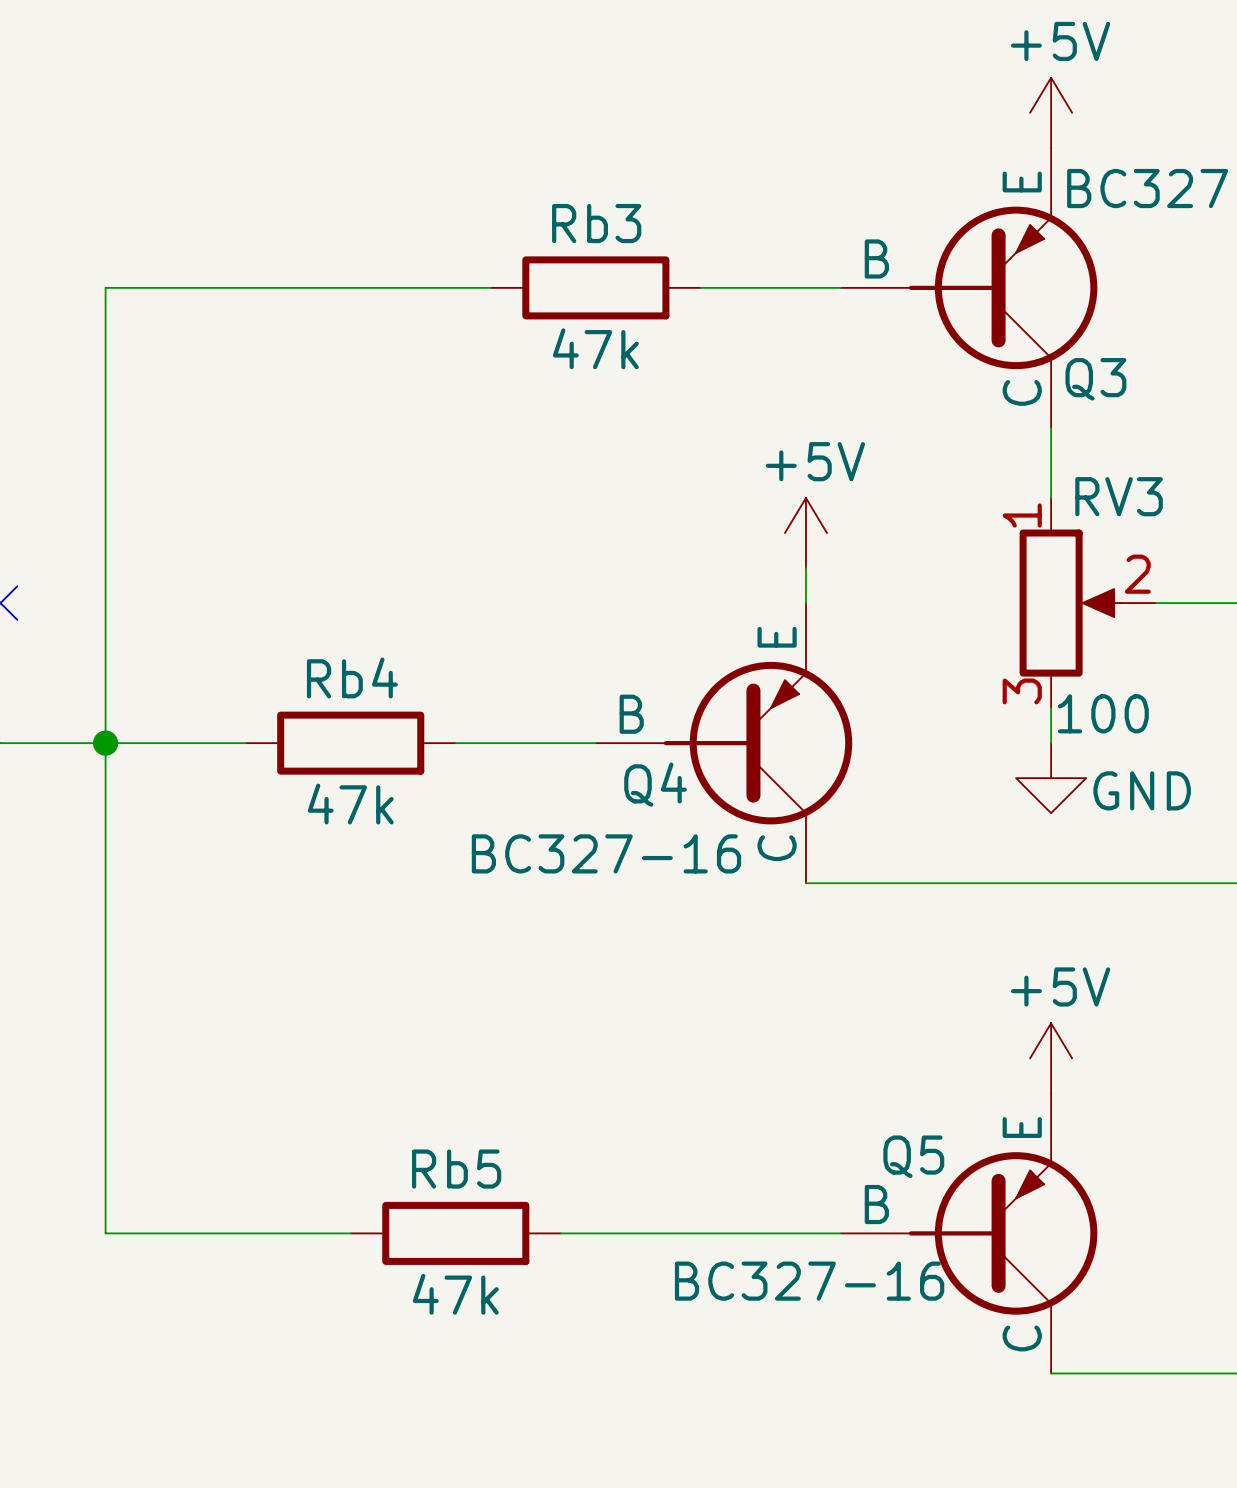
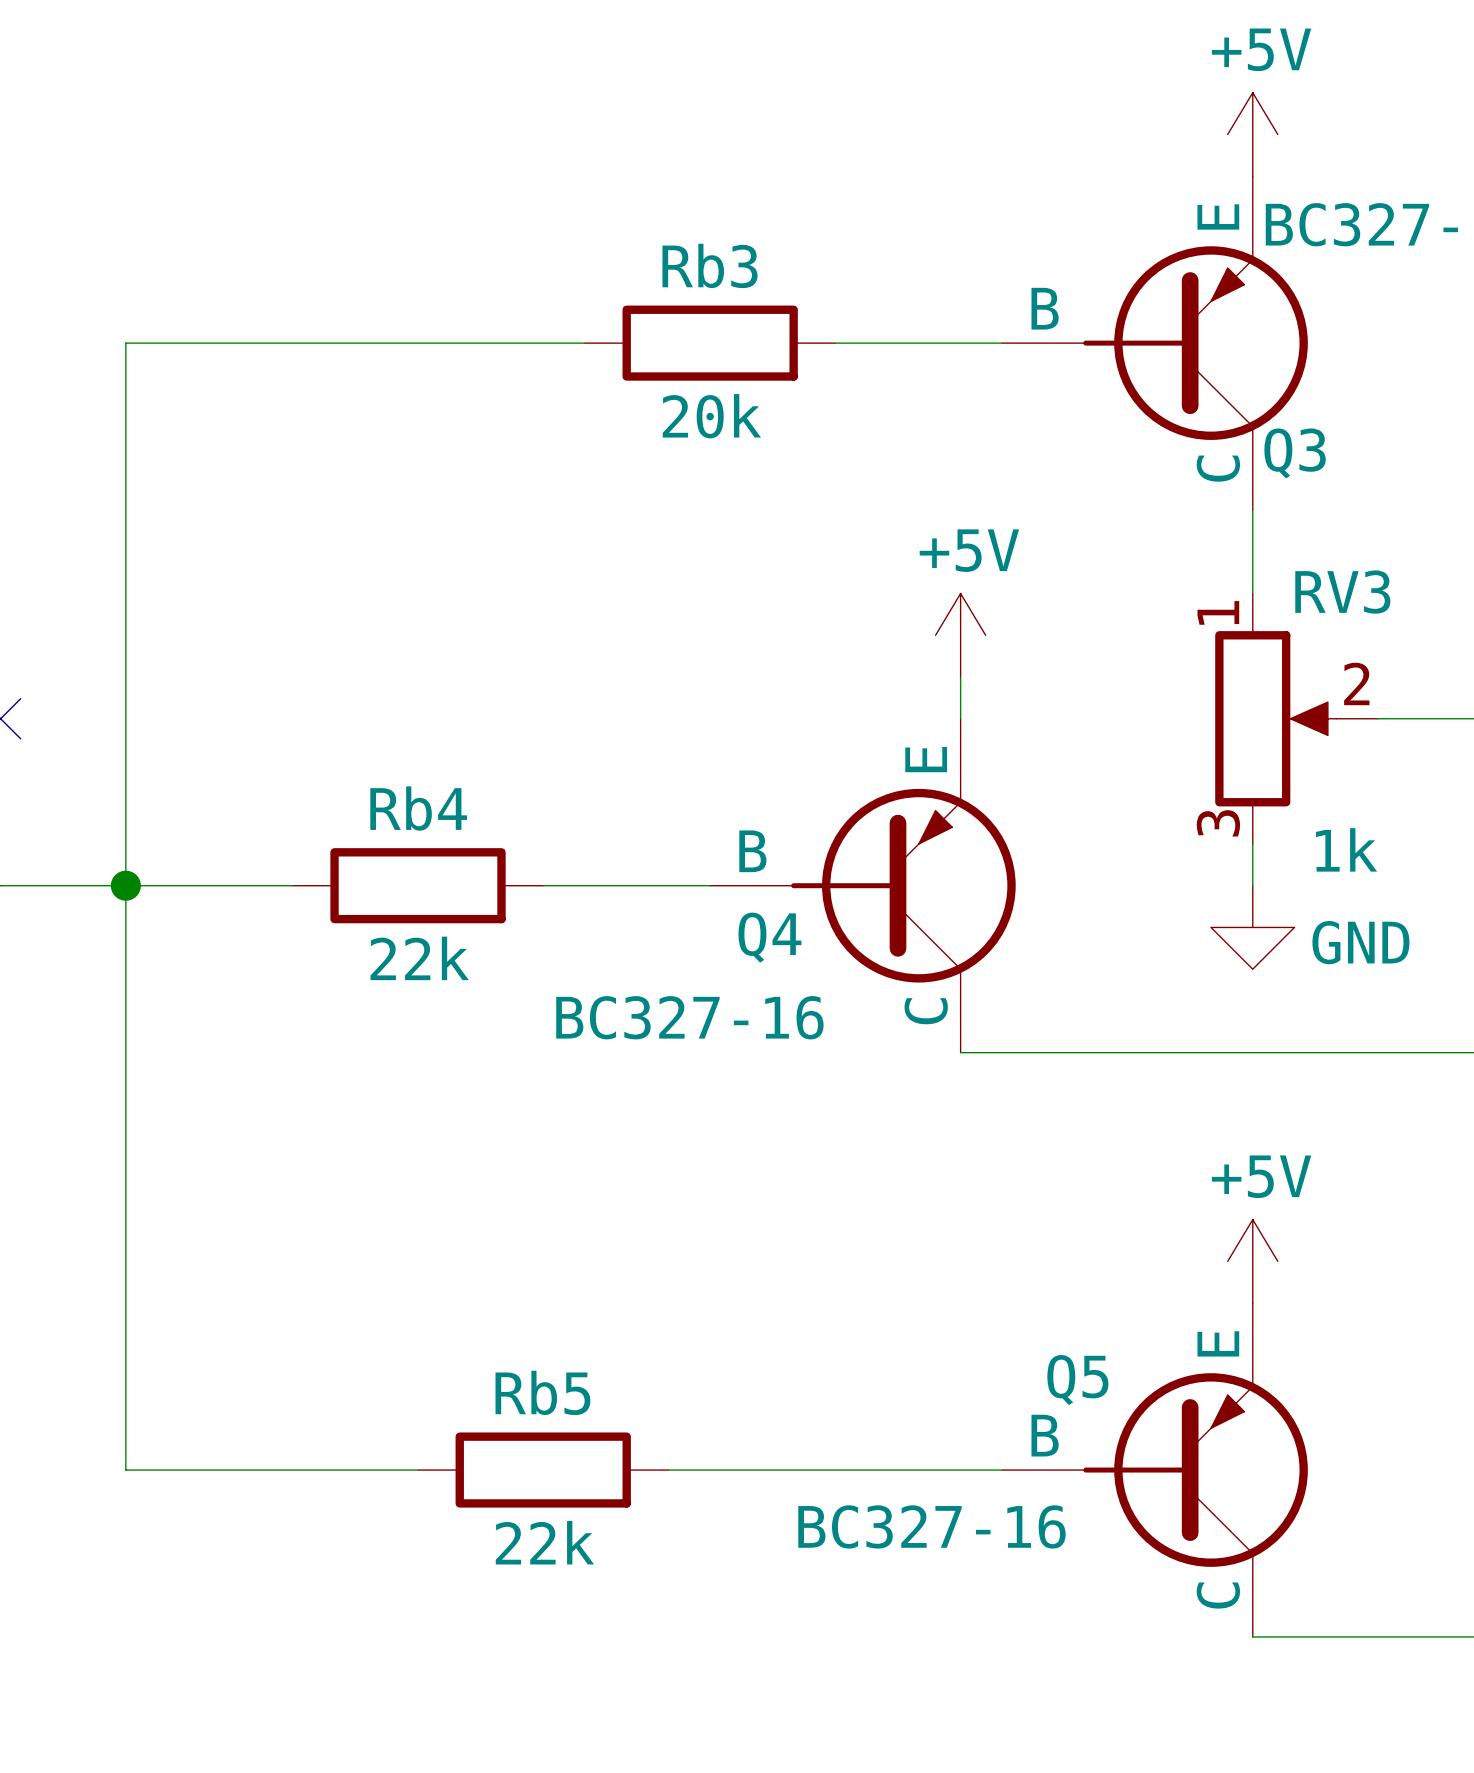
Rb3 value: 47k (595, 348) -> 20k (711, 416)
RV3 value: 100 (1103, 713) -> 1k (1346, 849)
Rb4 value: 47k (350, 804) -> 22k (419, 958)
Rb5 value: 47k (455, 1294) -> 22k (544, 1542)

